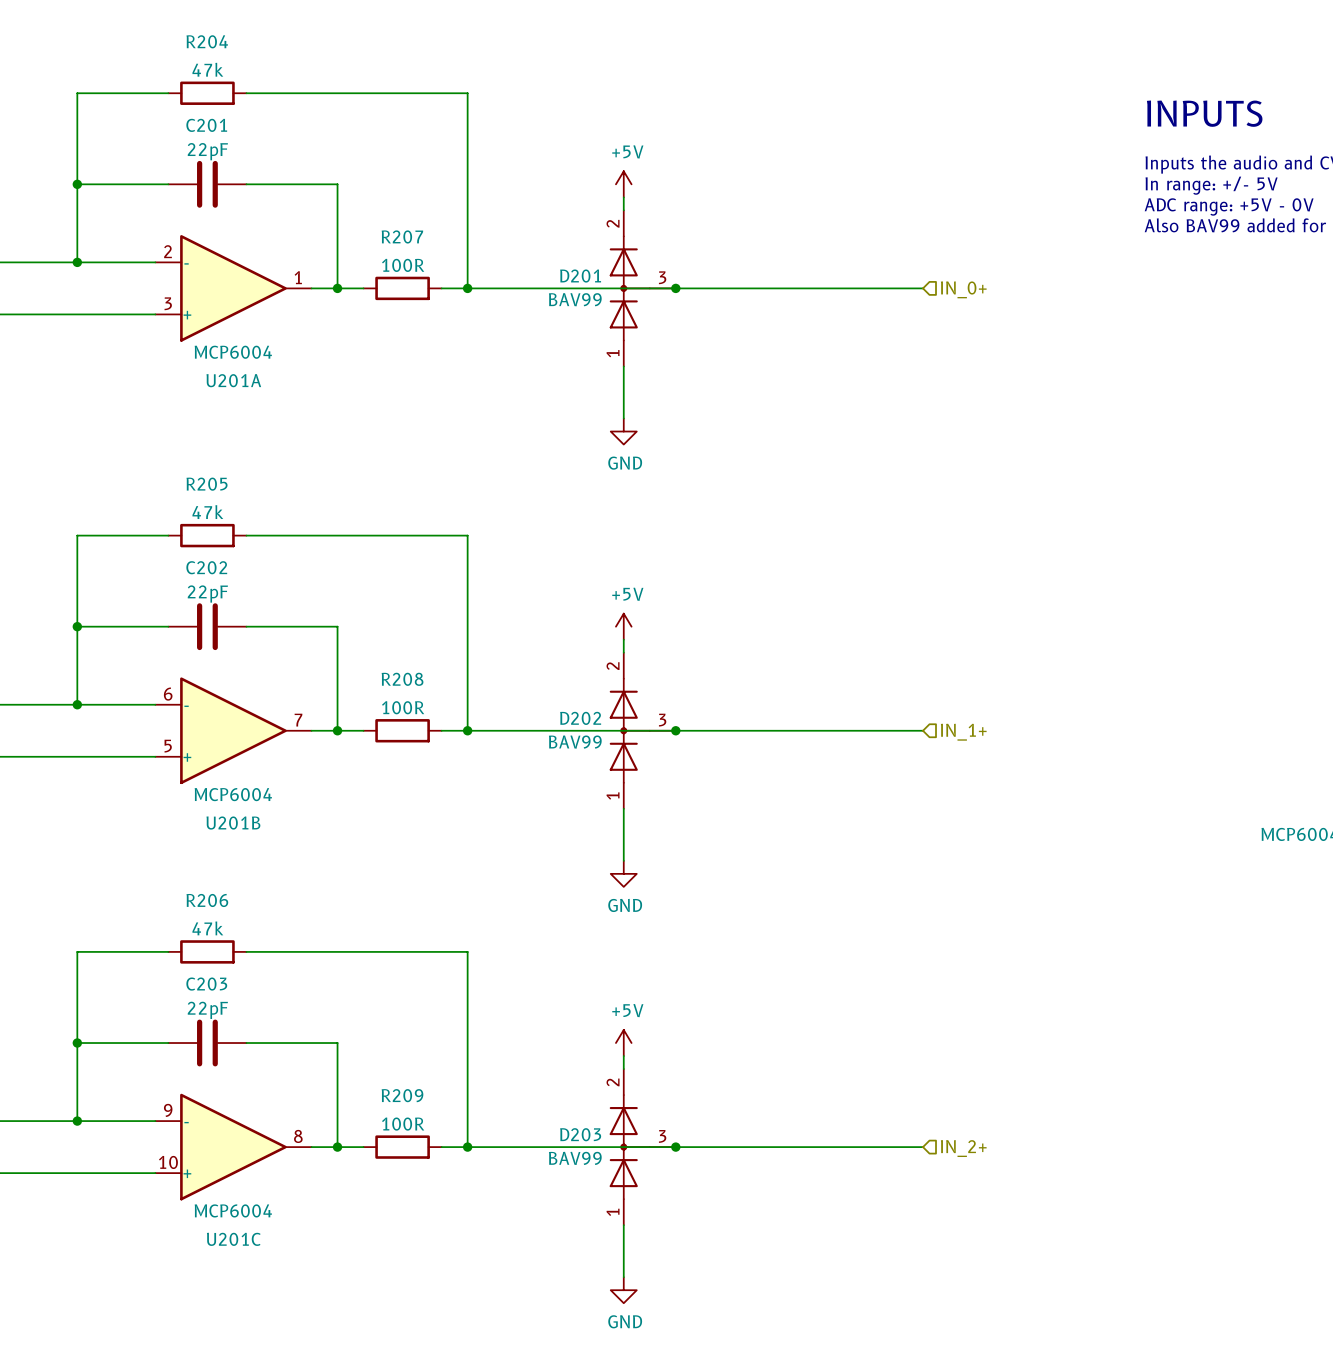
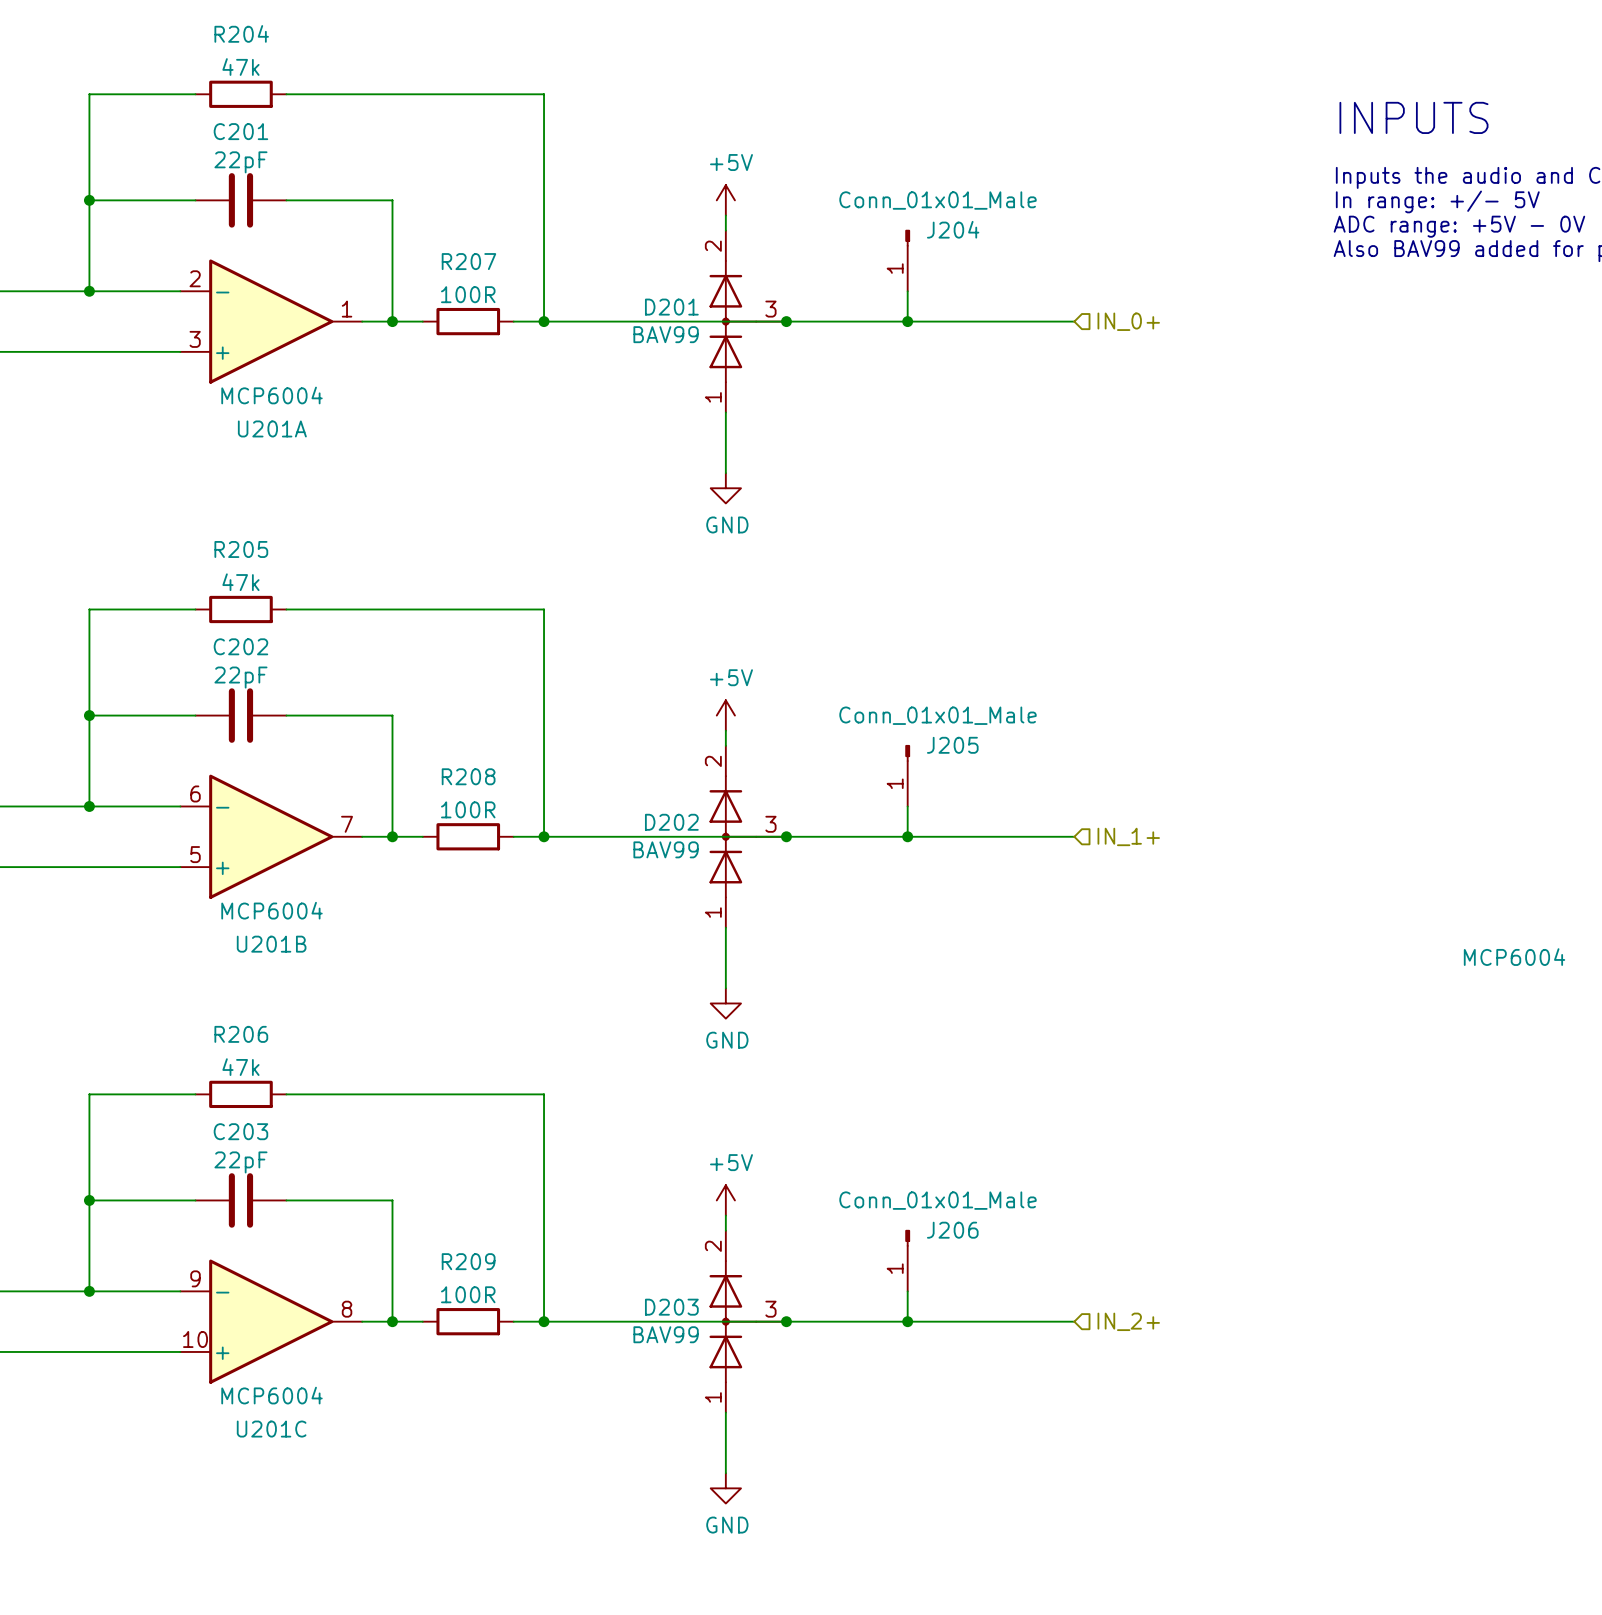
J204: none -> Conn_01x01_Male (907, 260)
wire: none -> (907, 291) (907, 321)
junction: none -> (907, 321)
J205: none -> Conn_01x01_Male (907, 775)
wire: none -> (907, 806) (907, 836)
junction: none -> (907, 836)
J206: none -> Conn_01x01_Male (907, 1260)
wire: none -> (907, 1291) (907, 1321)
junction: none -> (907, 1321)

